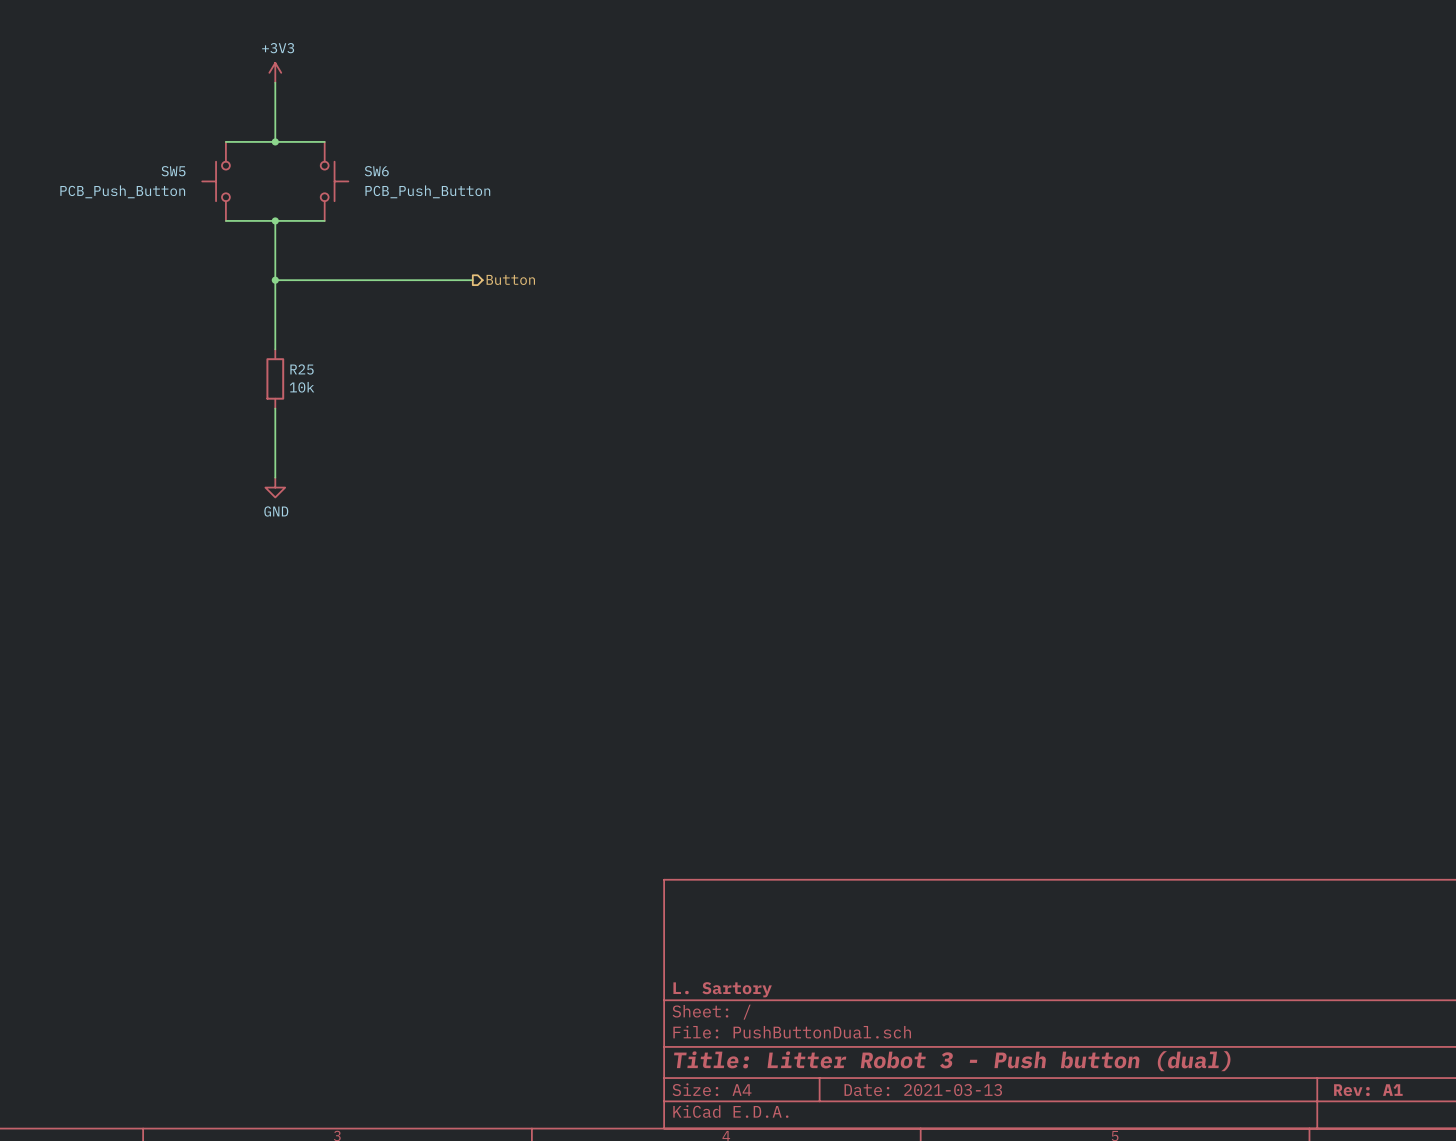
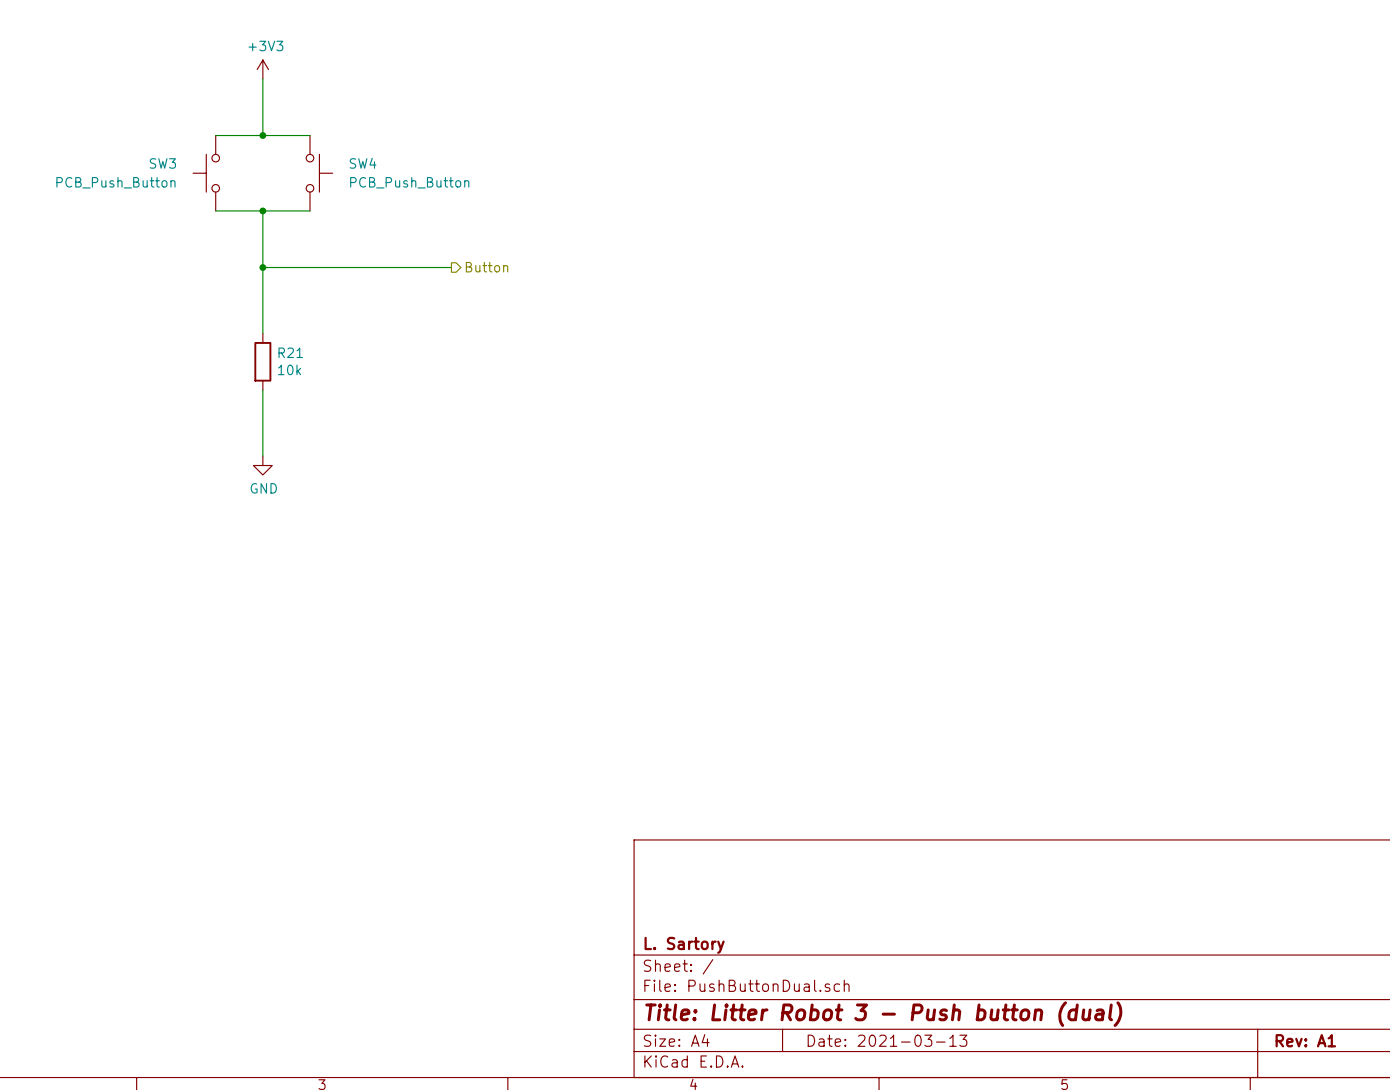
SW5 name: SW5 (173, 171) -> SW3 (162, 163)
SW6 name: SW6 (376, 171) -> SW4 (363, 163)
R25 name: R25 (302, 369) -> R21 (290, 352)

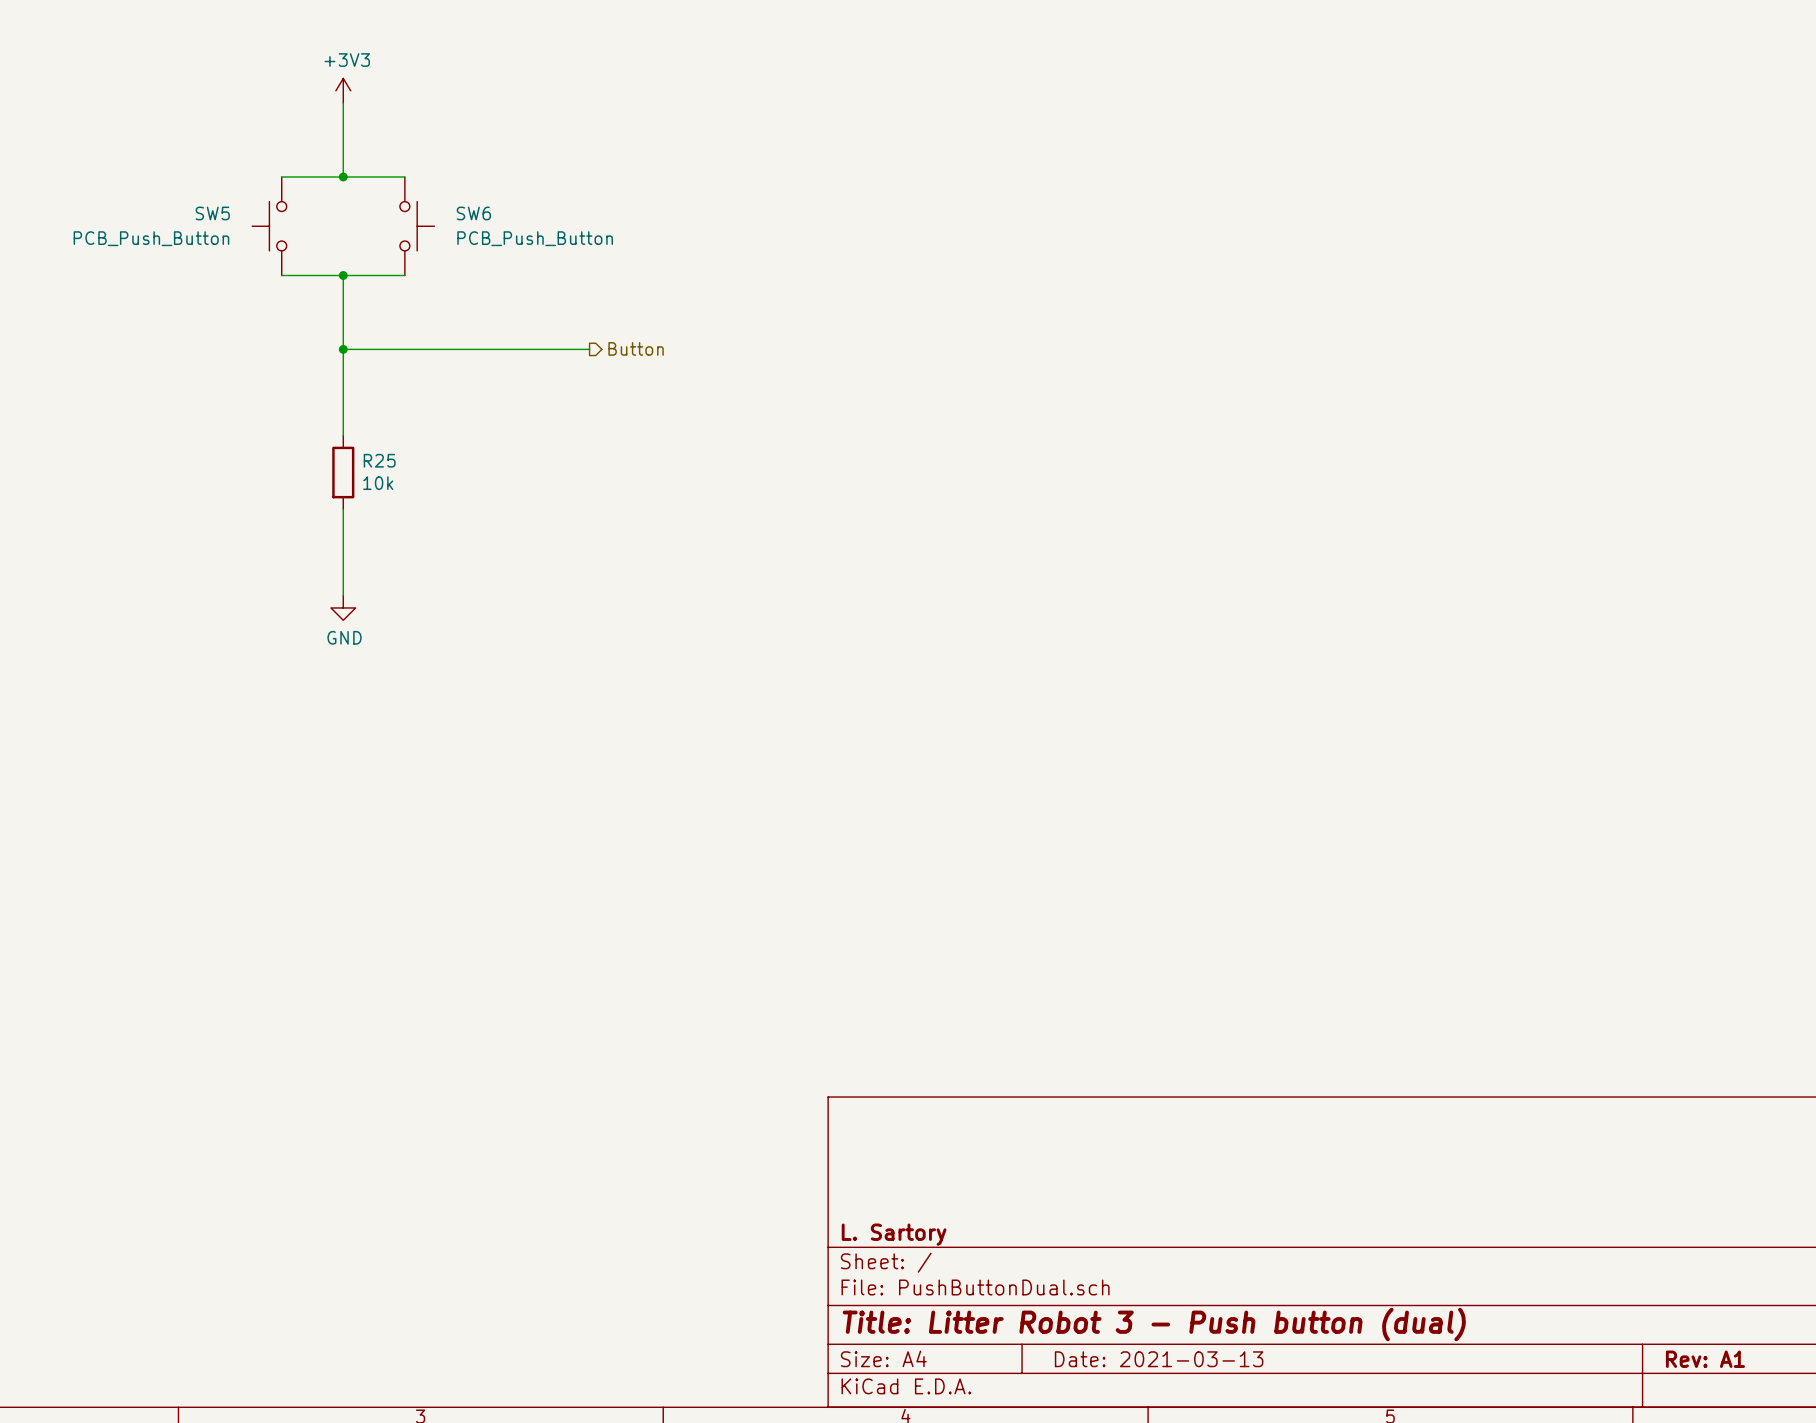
SW3 name: SW3 (162, 163) -> SW5 (212, 213)
SW4 name: SW4 (363, 163) -> SW6 (473, 213)
R21 name: R21 (290, 352) -> R25 (379, 460)

